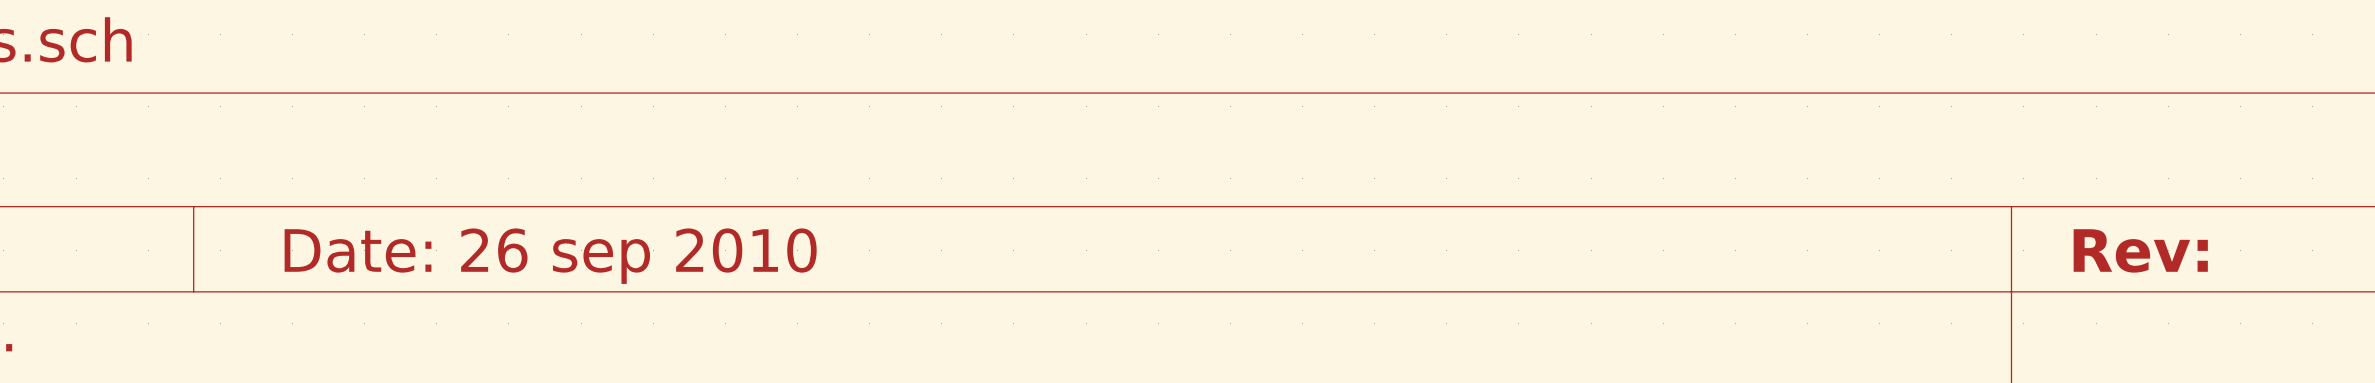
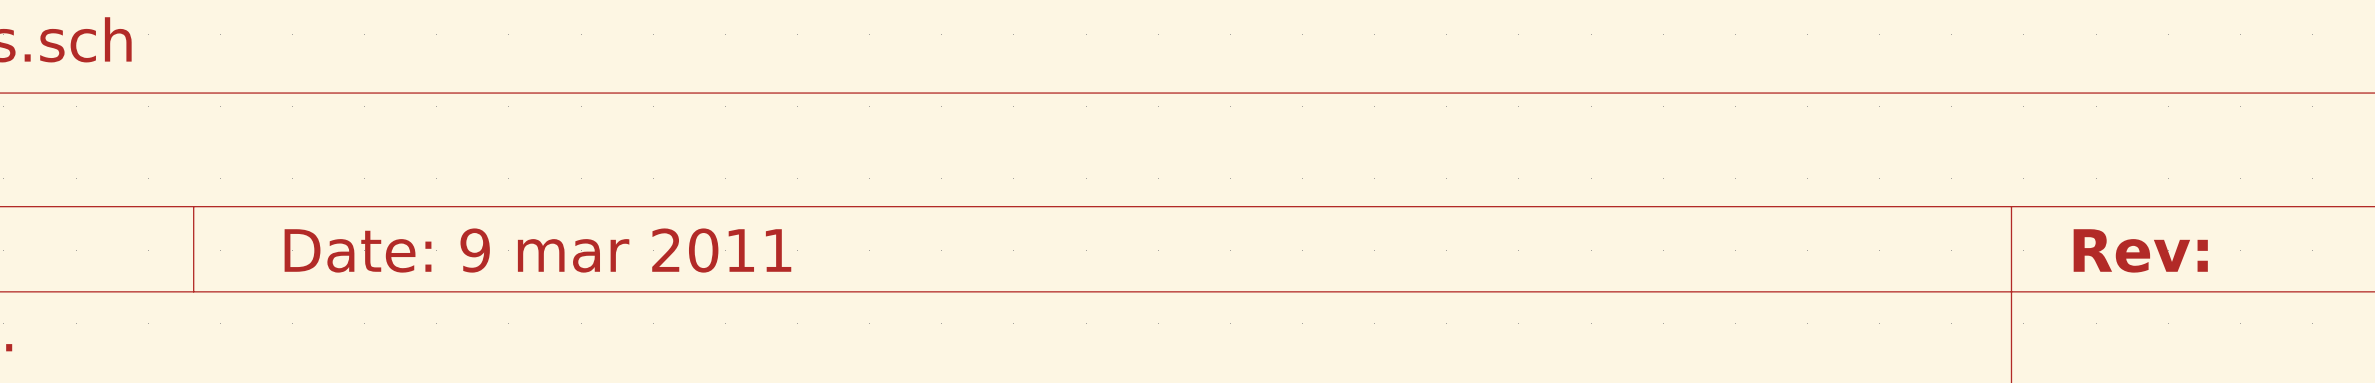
title block: Date: 26 sep 2010 (550, 256) -> Date: 9 mar 2011 (537, 250)

